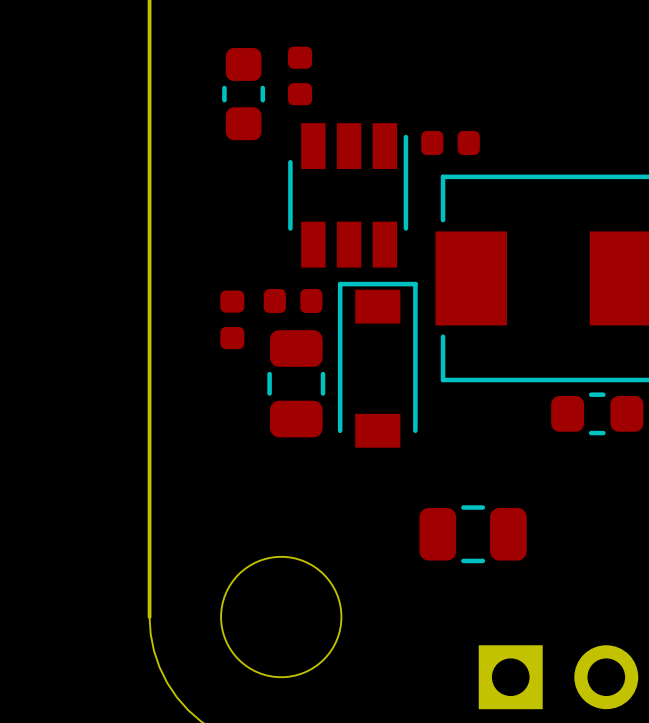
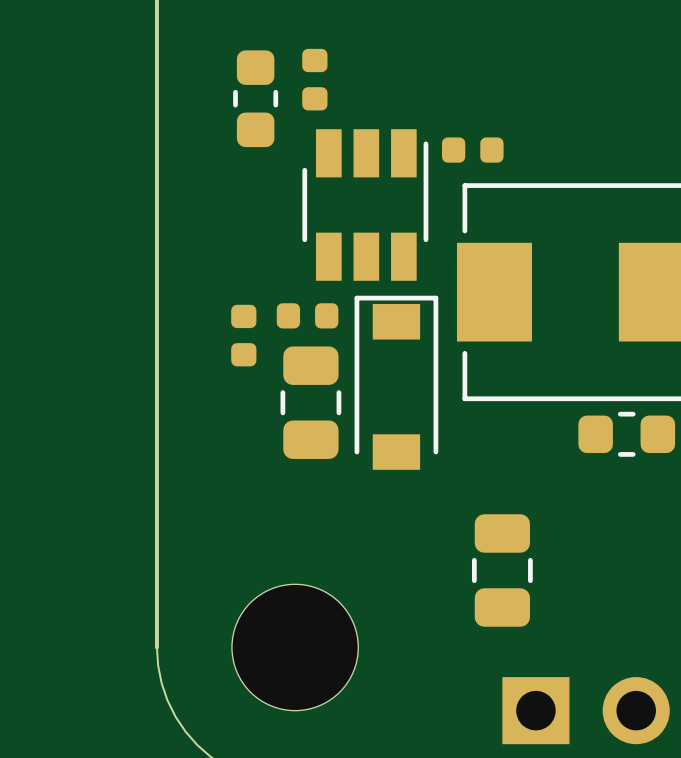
part rotation: 0° (473, 534) -> 90° clockwise (502, 570)

